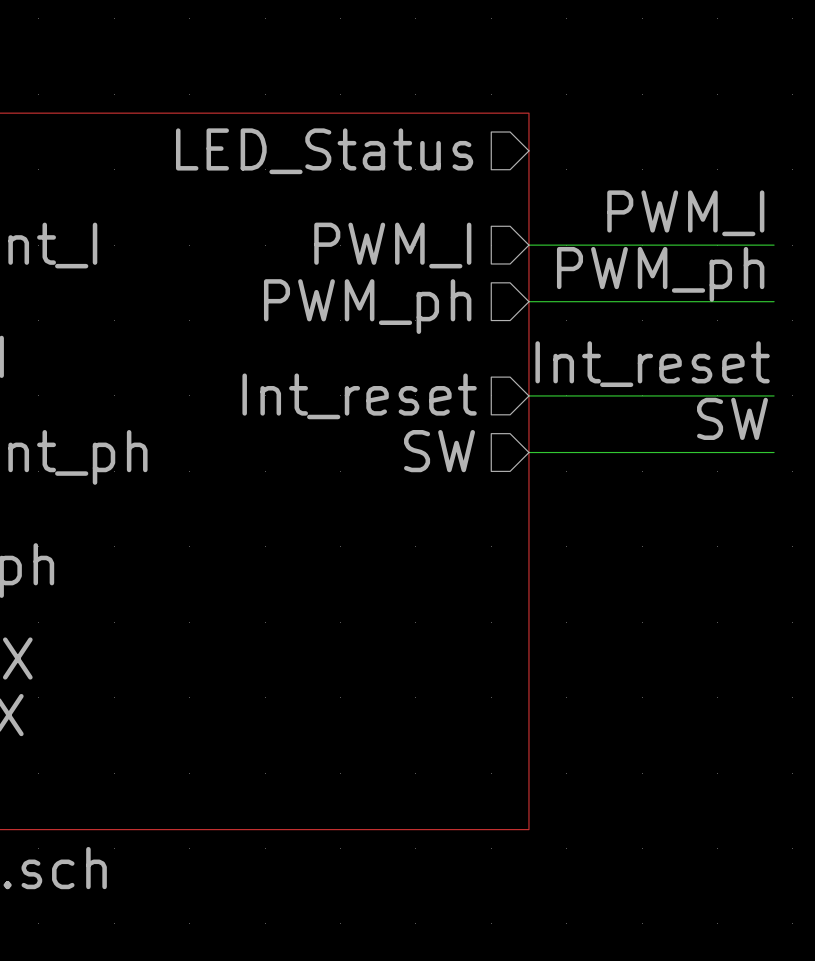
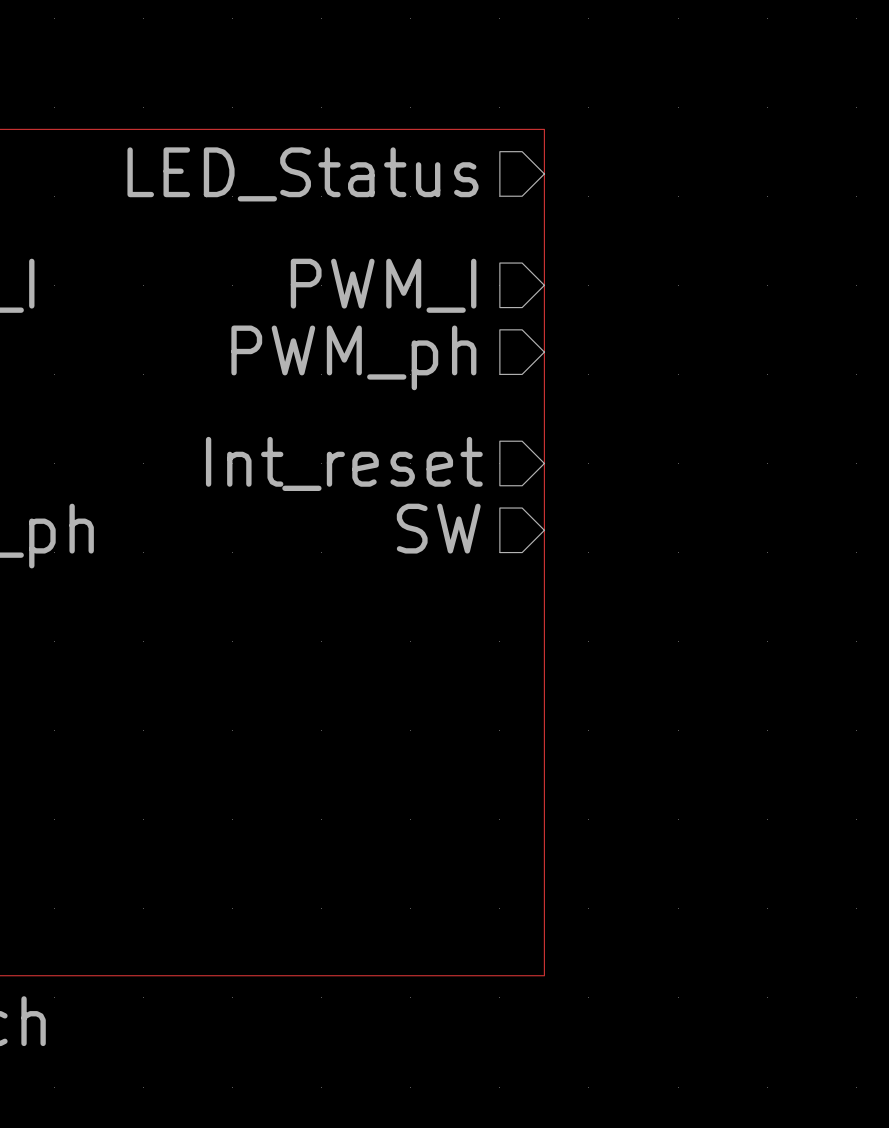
label: PWM_I (685, 213) -> none
wire: (528, 245) (774, 245) -> none
label: PWM_ph (660, 274) -> none
wire: (528, 301) (774, 301) -> none
label: Int_reset (652, 364) -> none
wire: (528, 395) (774, 395) -> none
label: SW (732, 418) -> none
wire: (528, 452) (774, 452) -> none

